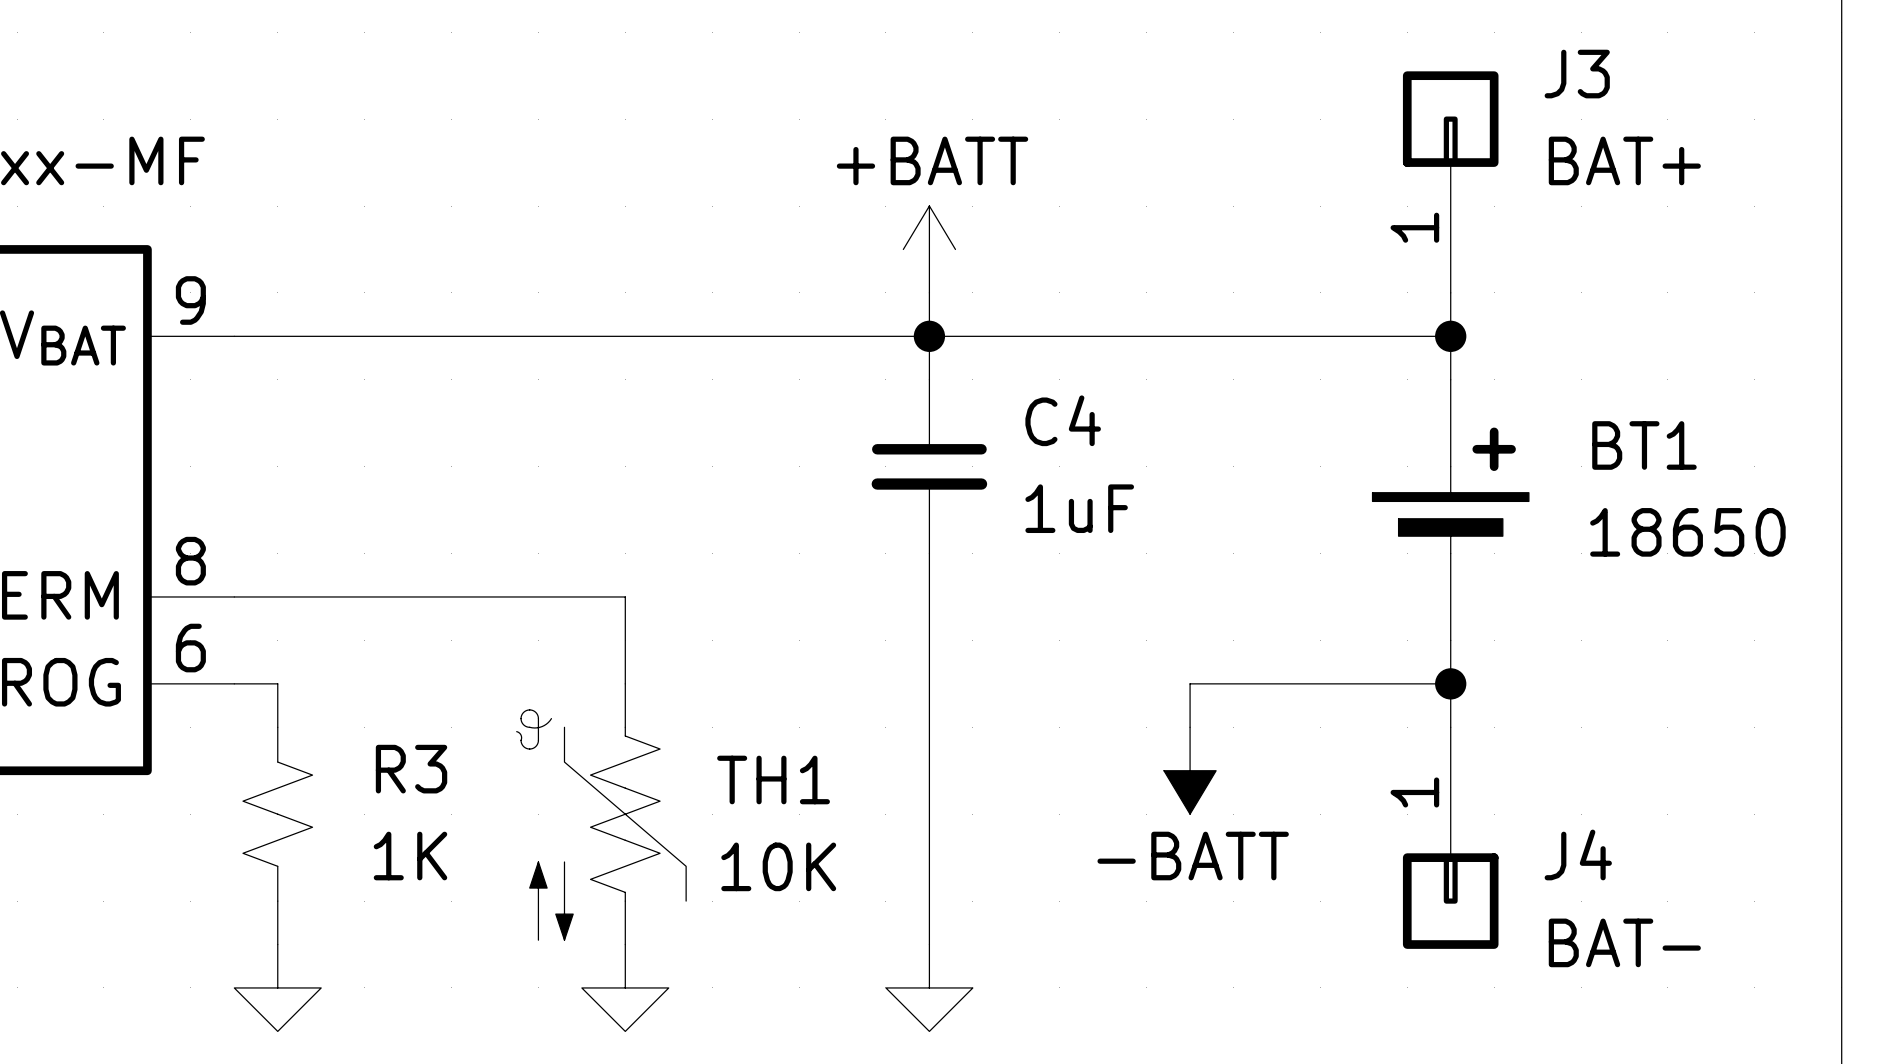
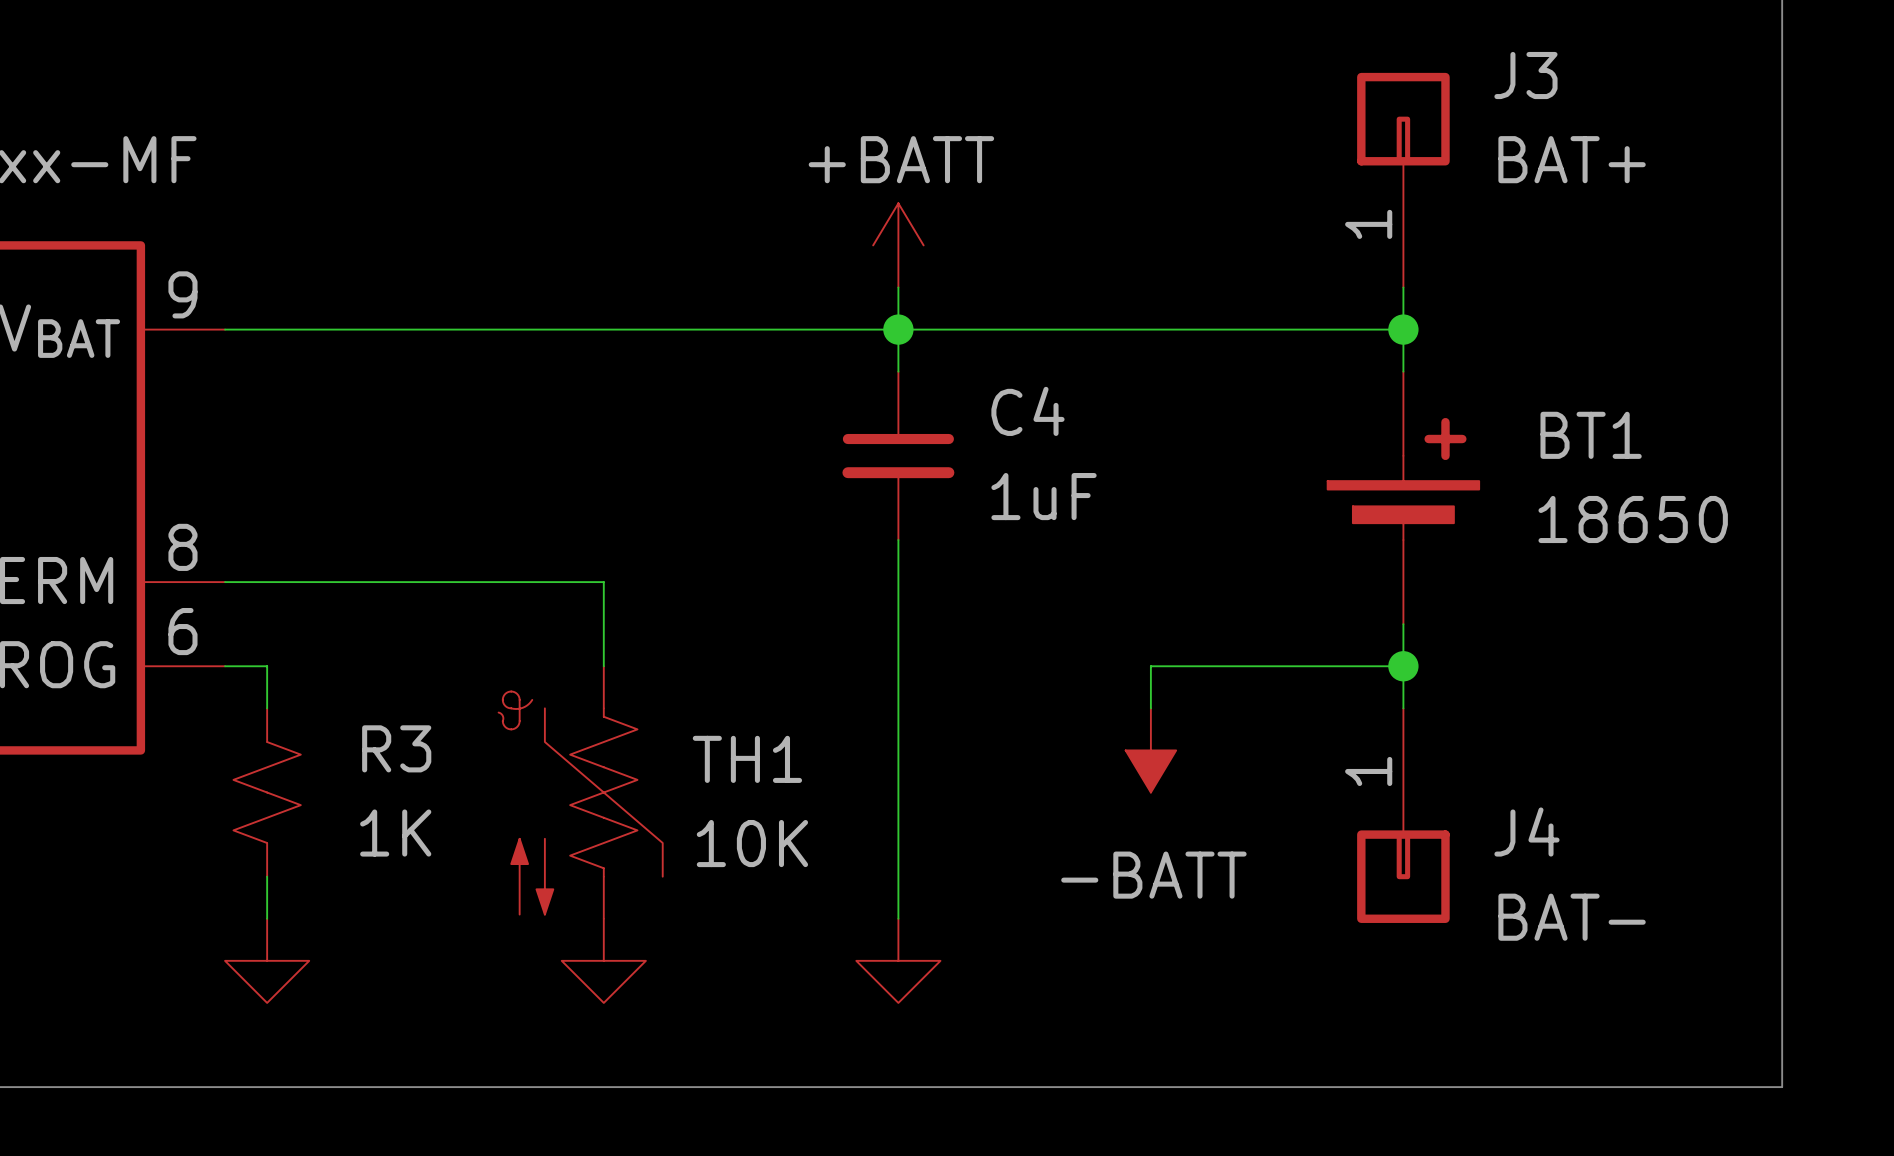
power symbol text position: -BATT (1193, 856) -> -BATT (1153, 875)

